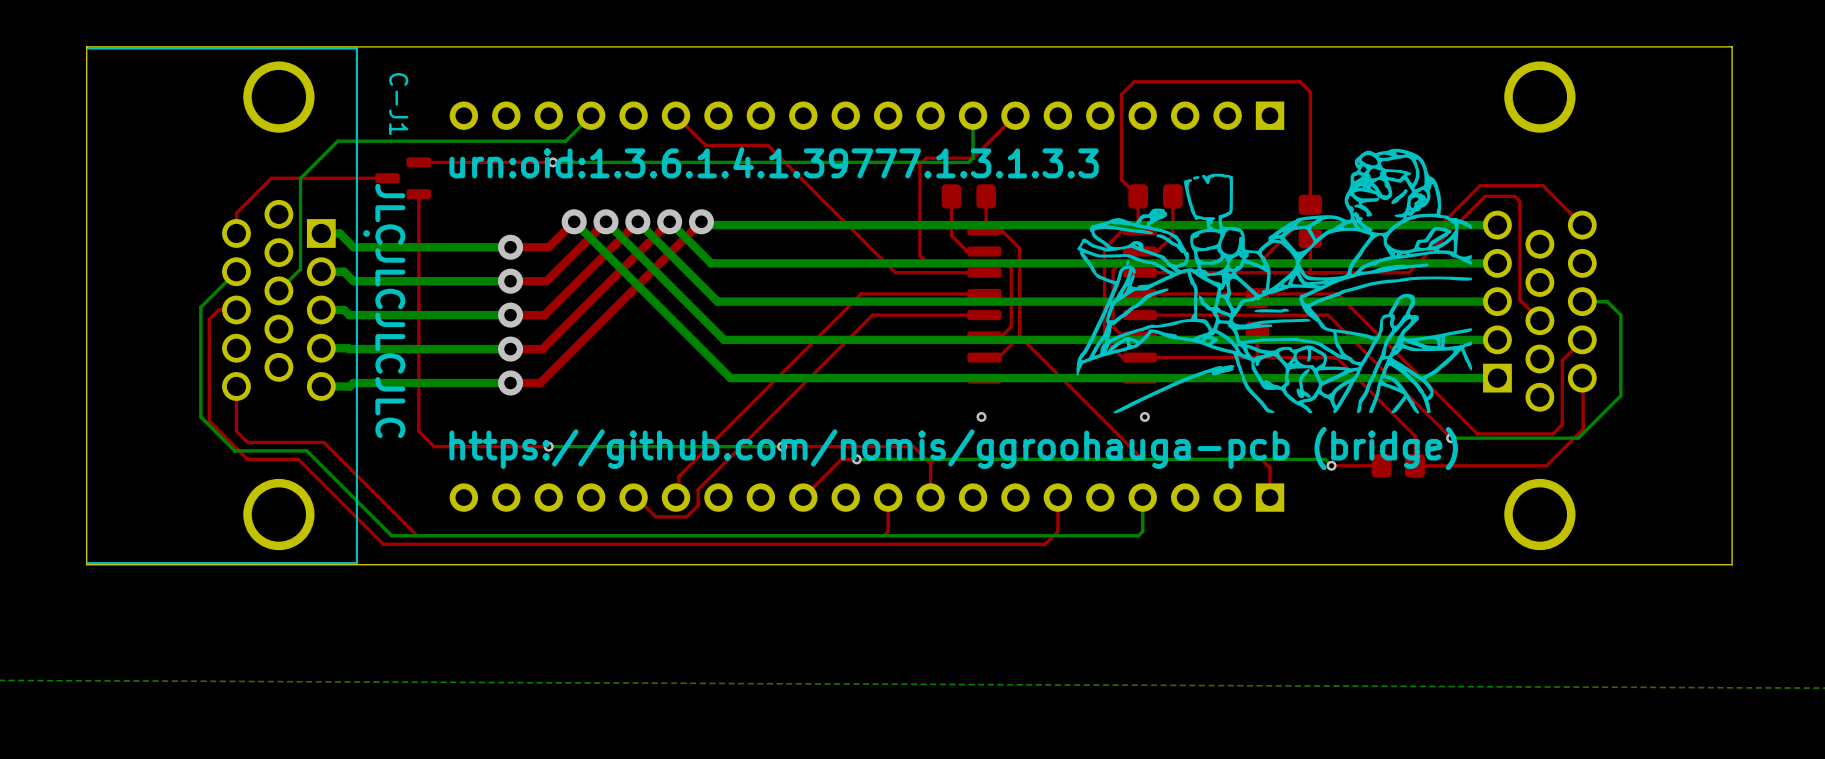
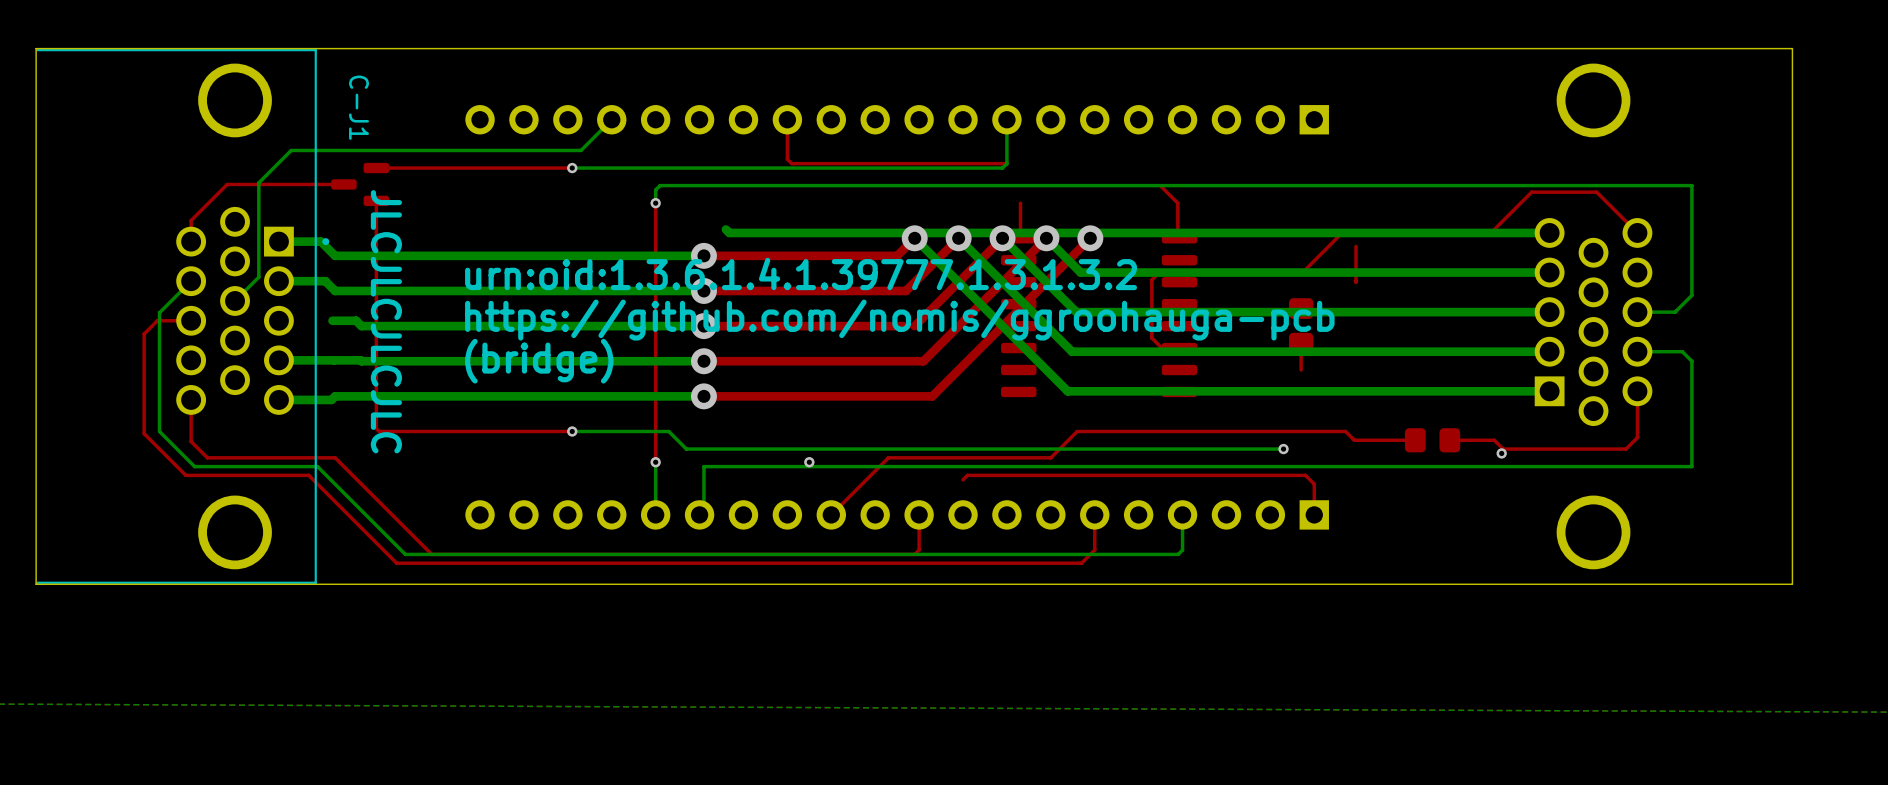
board edge: (1732, 46) (86, 46) (86, 564) (1732, 564) -> (1792, 48) (36, 48) (36, 584) (1792, 584)
top track: (676, 115) (705, 145) (768, 145) (895, 272) (984, 272) -> none
top track: (1015, 115) (973, 158) -> none
bottom track: (565, 141) (337, 141) (300, 178) (300, 269) (278, 290) -> (585, 146) (581, 150) (291, 150) (258, 182) (258, 277) (235, 300)
drawing: [1076, 148, 1473, 414] -> none
top track: (926, 158) (919, 164) (919, 255) (926, 262) (1005, 262) (1011, 268) (1011, 326) (1001, 336) (984, 336) -> (958, 163) (791, 163) (787, 159) (787, 119)
text: urn:oid:1.3.6.1.4.1.39777.1.3.1.3.3 (774, 162) -> none
top track: (271, 178) (236, 213) (236, 233) -> (280, 184) (227, 184) (191, 220) (191, 241)
top track: (387, 178) (332, 178) -> (433, 168) (376, 168)
part position: (403, 178) -> (360, 184)
top track: (1121, 179) (1121, 94) (1134, 81) (1300, 81) (1310, 92) (1310, 204) -> none
top track: none -> (376, 200) (376, 428) (379, 431) (572, 431)
top track: (418, 194) (418, 431) (434, 446) (548, 446) -> none
top track: none -> (655, 203) (655, 462)
bottom track: none -> (655, 203) (655, 189) (660, 185) (1691, 185) (1691, 295) (1675, 312)
via: none -> (655, 203)
top track: (951, 196) (951, 235) (967, 251) (984, 251) -> none
part: (968, 196) -> none
part: (1155, 196) -> none
top track: (1172, 196) (1172, 235) (1156, 251) (1139, 251) -> none
top track: (574, 221) (548, 247) (510, 247) -> none
bottom track: (574, 221) (730, 378) (1031, 378) -> (914, 238) (1067, 391)
via: (574, 221) -> none
top track: (606, 221) (546, 281) (510, 281) -> none
bottom track: (606, 221) (724, 339) (1035, 339) -> (958, 238) (1072, 351)
via: (606, 221) -> none
top track: (637, 221) (544, 315) (510, 315) -> none
bottom track: (637, 221) (717, 301) (1040, 301) -> (1002, 238) (1076, 312)
via: (637, 221) -> none
top track: (669, 221) (542, 349) (510, 349) -> none
bottom track: (669, 221) (711, 263) (1044, 263) -> (1046, 238) (1080, 272)
via: (669, 221) -> none
top track: (701, 221) (540, 383) (510, 383) -> none
via: (701, 221) -> none
part: (1310, 221) -> none
top track: none -> (914, 238) (897, 255) (703, 255)
via: none -> (914, 238)
top track: none -> (958, 238) (905, 290) (703, 290)
via: none -> (958, 238)
via: none -> (1002, 238)
top track: (984, 230) (1001, 230) (1019, 248) (1019, 336) -> none
top track: none -> (1046, 238) (923, 361) (703, 361)
via: none -> (1046, 238)
top track: none -> (1090, 238) (932, 396) (703, 396)
via: none -> (1090, 238)
top track: (1141, 230) (1122, 230) (1104, 248) (1104, 339) (1122, 357) (1336, 357) (1415, 436) (1415, 476) -> none
bottom track: (321, 233) (339, 233) (353, 247) -> (278, 241) (320, 241) (335, 255) (365, 255)
via: (510, 247) -> none
bottom track: none -> (703, 255) (528, 255)
via: none -> (703, 255)
text: none -> urn:oid:1.3.6.1.4.1.39777.1.3.1.3.2 (801, 273)
bottom track: (236, 271) (200, 307) (200, 416) (234, 450) -> (191, 281) (159, 312) (159, 431) (194, 466) (242, 466)
bottom track: (321, 271) (344, 271) (353, 281) -> (278, 281) (325, 281) (335, 290) (365, 290)
top track: (1139, 272) (1408, 272) (1485, 196) (1514, 196) (1519, 201) (1519, 299) (1540, 320) -> none
via: (510, 281) -> none
bottom track: none -> (703, 290) (528, 290)
via: none -> (703, 290)
top track: (984, 293) (861, 293) (678, 476) (678, 497) -> none
top track: (1248, 293) (1139, 293) -> none
top track: (1261, 293) (1337, 293) (1477, 433) -> (1449, 440) (1494, 440) (1503, 449) (1528, 449)
bottom track: (1607, 301) (1620, 315) (1620, 395) (1578, 438) (1451, 438) -> (1663, 312) (1675, 312)
C-J1 position: (228, 305) -> (182, 316)
top track: (236, 309) (218, 309) (209, 319) (209, 421) (247, 459) -> (191, 320) (157, 320) (144, 334) (144, 433) (185, 475) (256, 475)
text: none -> https://github.com/nomis/ggroohauga-pcb (899, 320)
text position: JLCJLCJLCJLC (390, 310) -> JLCJLCJLCJLC (386, 321)
via: (510, 315) -> none
bottom track: none -> (703, 326) (528, 326)
via: none -> (703, 326)
top track: (872, 315) (698, 489) (698, 505) (686, 516) (655, 516) (636, 497) -> (903, 326) (703, 326)
top track: (984, 315) (883, 315) -> (1002, 238) (914, 326)
top track: (1139, 315) (1328, 315) (1451, 438) -> none
top track: (1019, 336) (1142, 459) -> none
top track: (1019, 336) (998, 357) -> none
bottom track: none -> (1637, 351) (1682, 351) (1691, 361) (1691, 466) (703, 466) (703, 514)
top track: (1583, 339) (1562, 360) (1562, 424) (1552, 433) -> (1637, 391) (1637, 437) (1626, 449) (1607, 449)
bottom track: none -> (332, 360) (278, 360)
via: (510, 349) -> none
text: none -> (bridge) (539, 361)
bottom track: none -> (703, 361) (528, 361)
via: none -> (703, 361)
top track: (1583, 378) (1583, 429) (1546, 465) (1415, 465) -> none
bottom track: (353, 383) (350, 386) (321, 386) -> (365, 396) (335, 396) (331, 399) (278, 399)
via: (510, 383) -> none
bottom track: none -> (703, 396) (528, 396)
via: none -> (703, 396)
top track: (236, 386) (236, 431) (247, 442) -> (191, 399) (191, 441) (207, 457) (256, 457)
bottom track: none -> (572, 431) (668, 431) (686, 449) (1283, 449)
via: (981, 416) -> none
via: (1144, 416) -> none
via: none -> (1283, 449)
via position: (548, 446) -> (572, 431)
bottom track: none -> (655, 462) (655, 514)
via: none -> (655, 462)
top track: (782, 446) (913, 446) (930, 463) (930, 497) -> none
bottom track: (782, 446) (548, 446) -> none
text: https://github.com/nomis/ggroohauga-pcb (bridge) (953, 448) -> none
top track: (856, 459) (841, 459) -> (1415, 440) (1354, 440) (1345, 431) (1077, 431) (1050, 457) (888, 457) (870, 475)
bottom track: (856, 459) (1325, 459) (1331, 465) -> none
via: (856, 459) -> none
via: (1331, 465) -> none
top track: (1381, 465) (1331, 465) -> none
part position: (1398, 465) -> (1432, 440)

